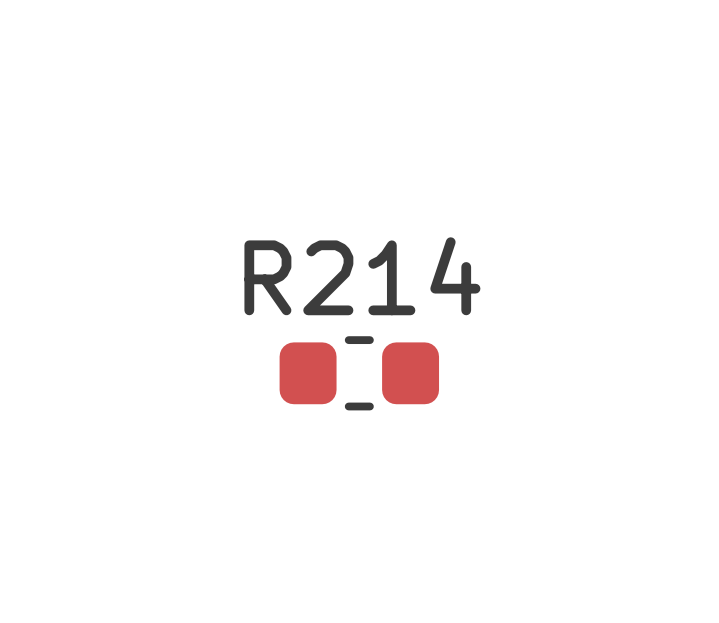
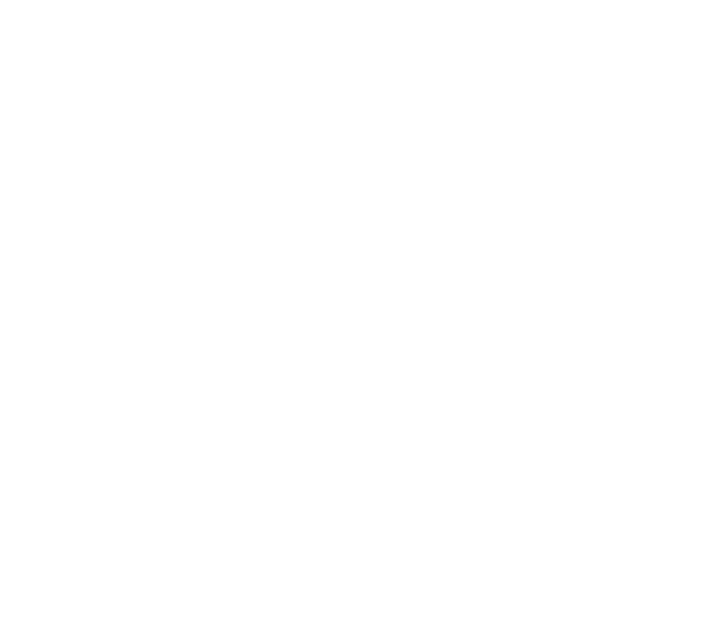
R214: (359, 373) -> none

